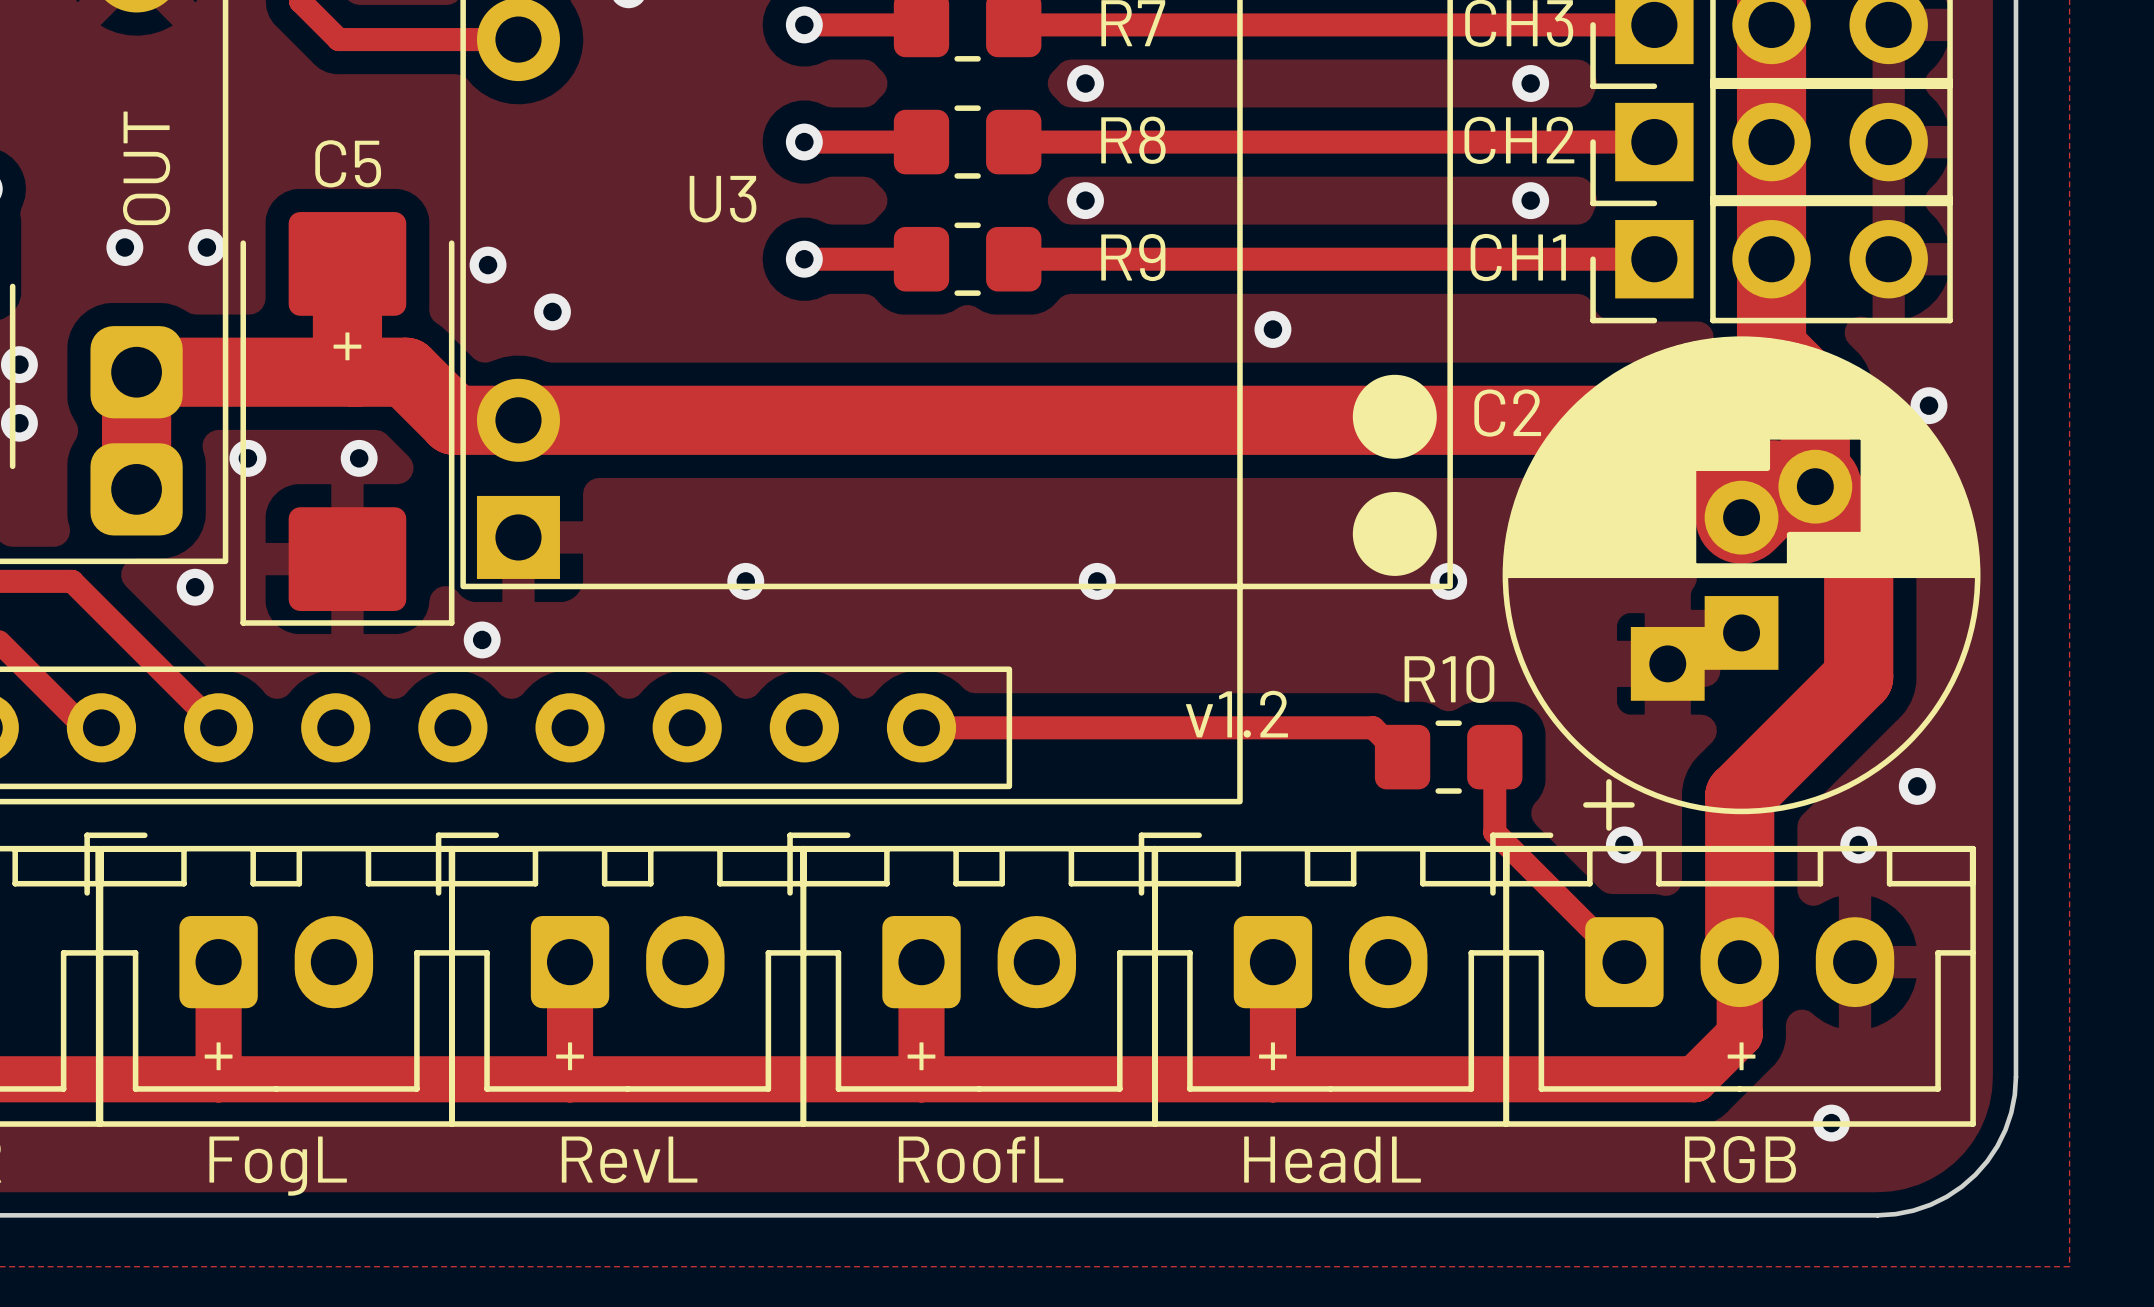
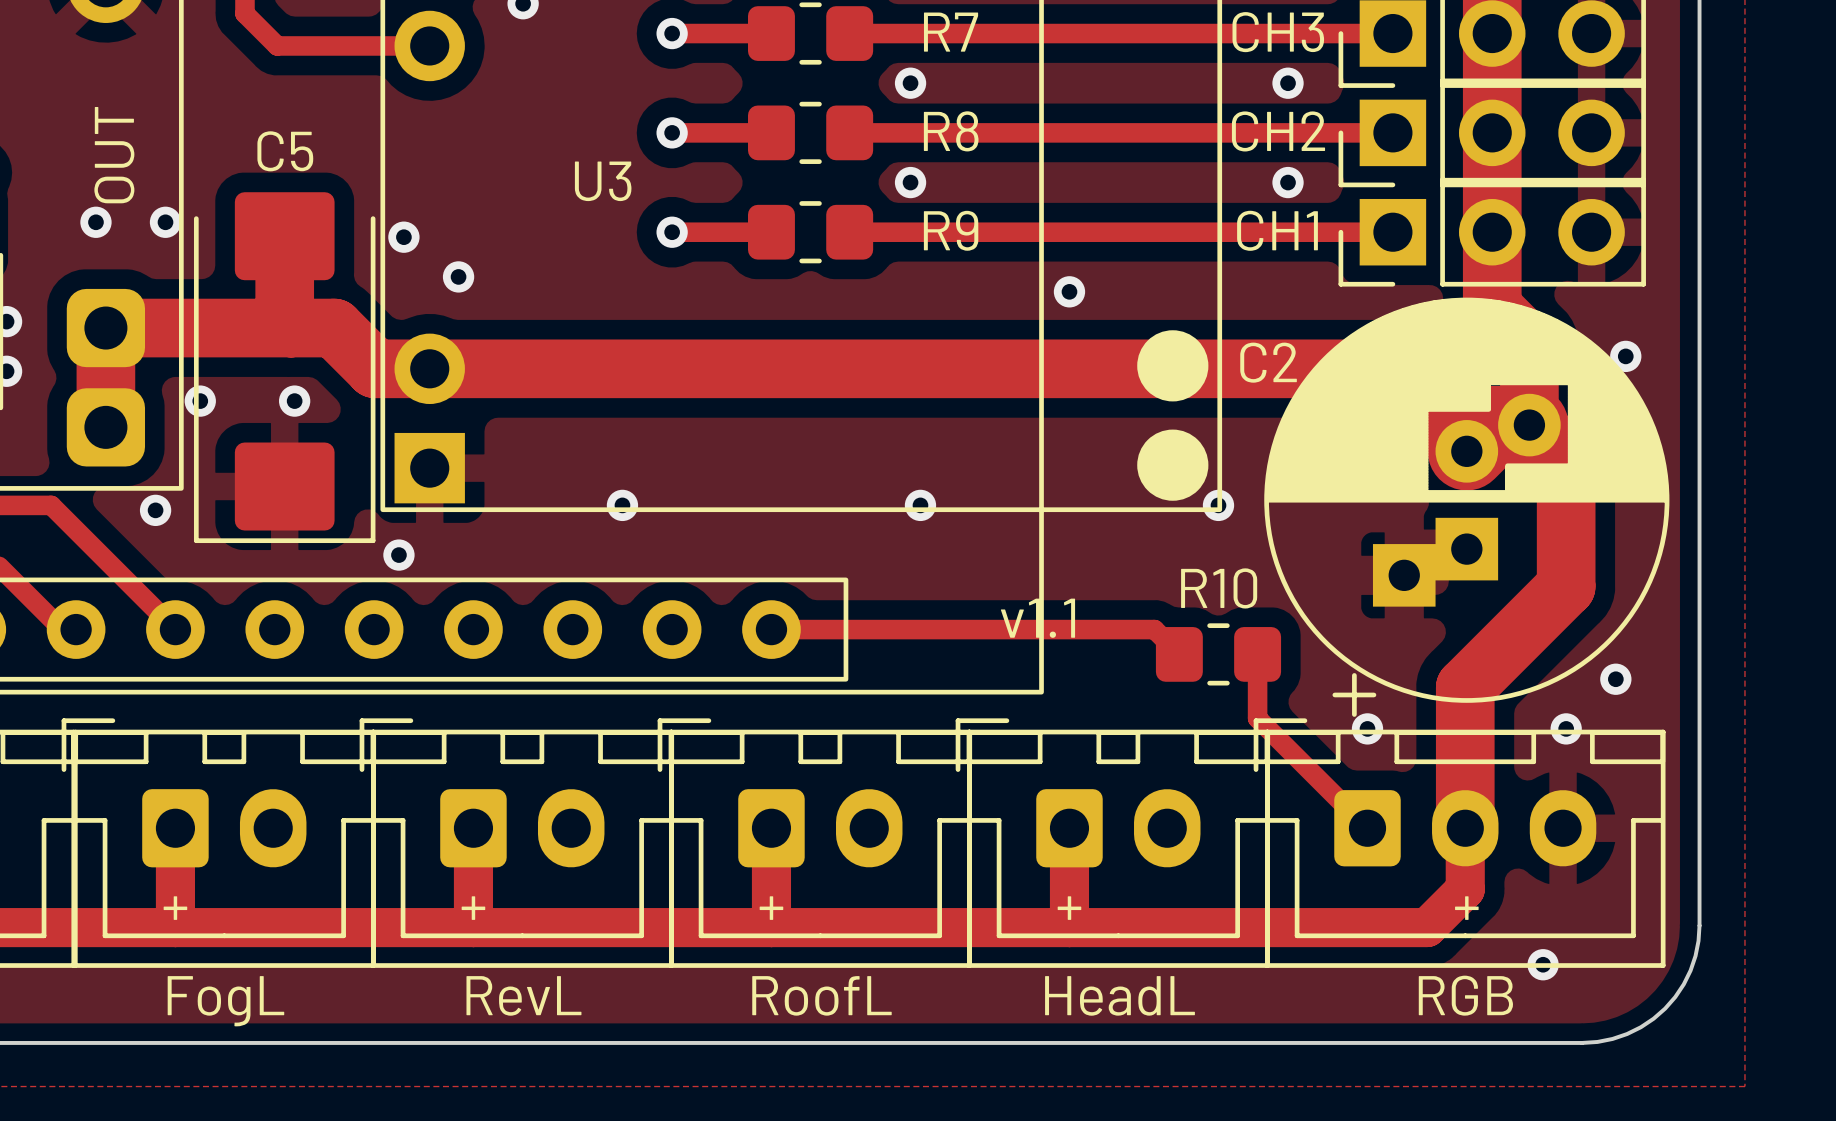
text: + (347, 346) -> none
text: v1.2 (1236, 714) -> v1.1 (1037, 618)

